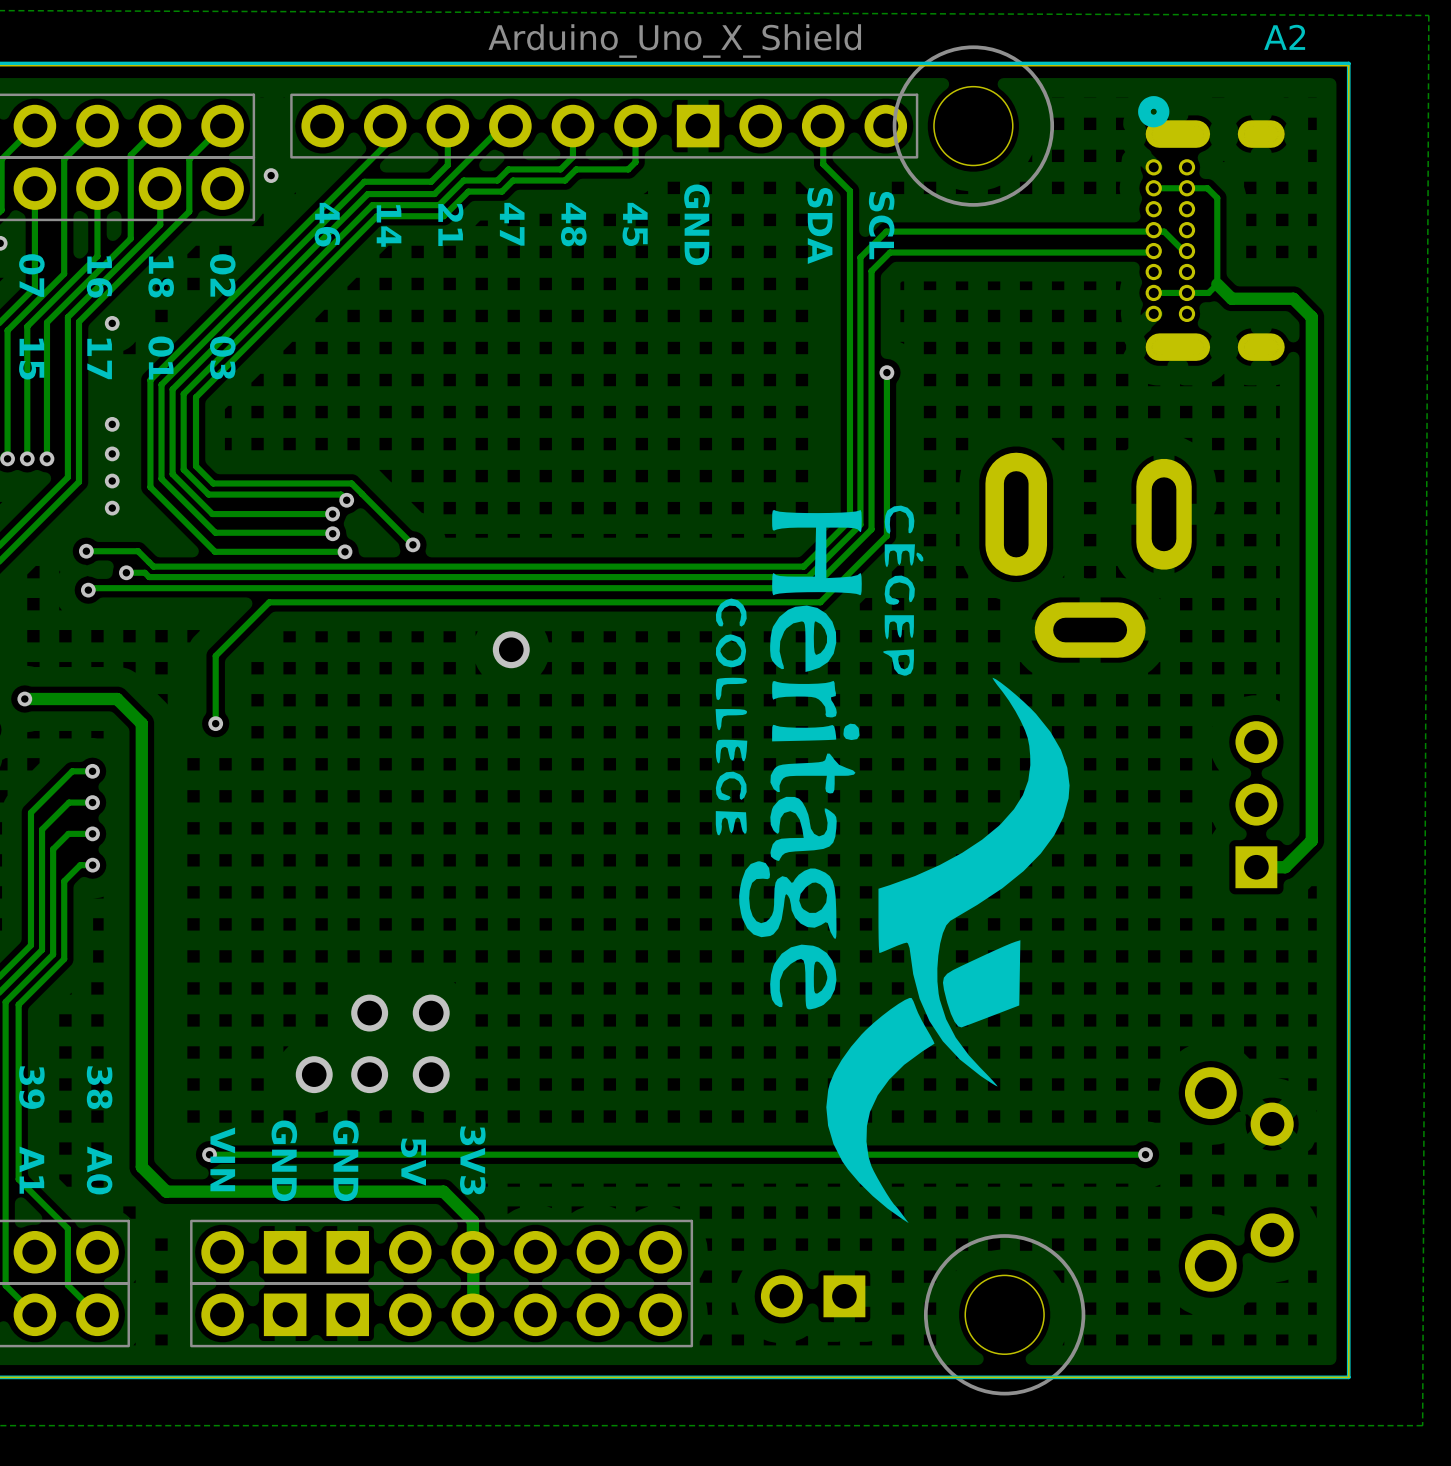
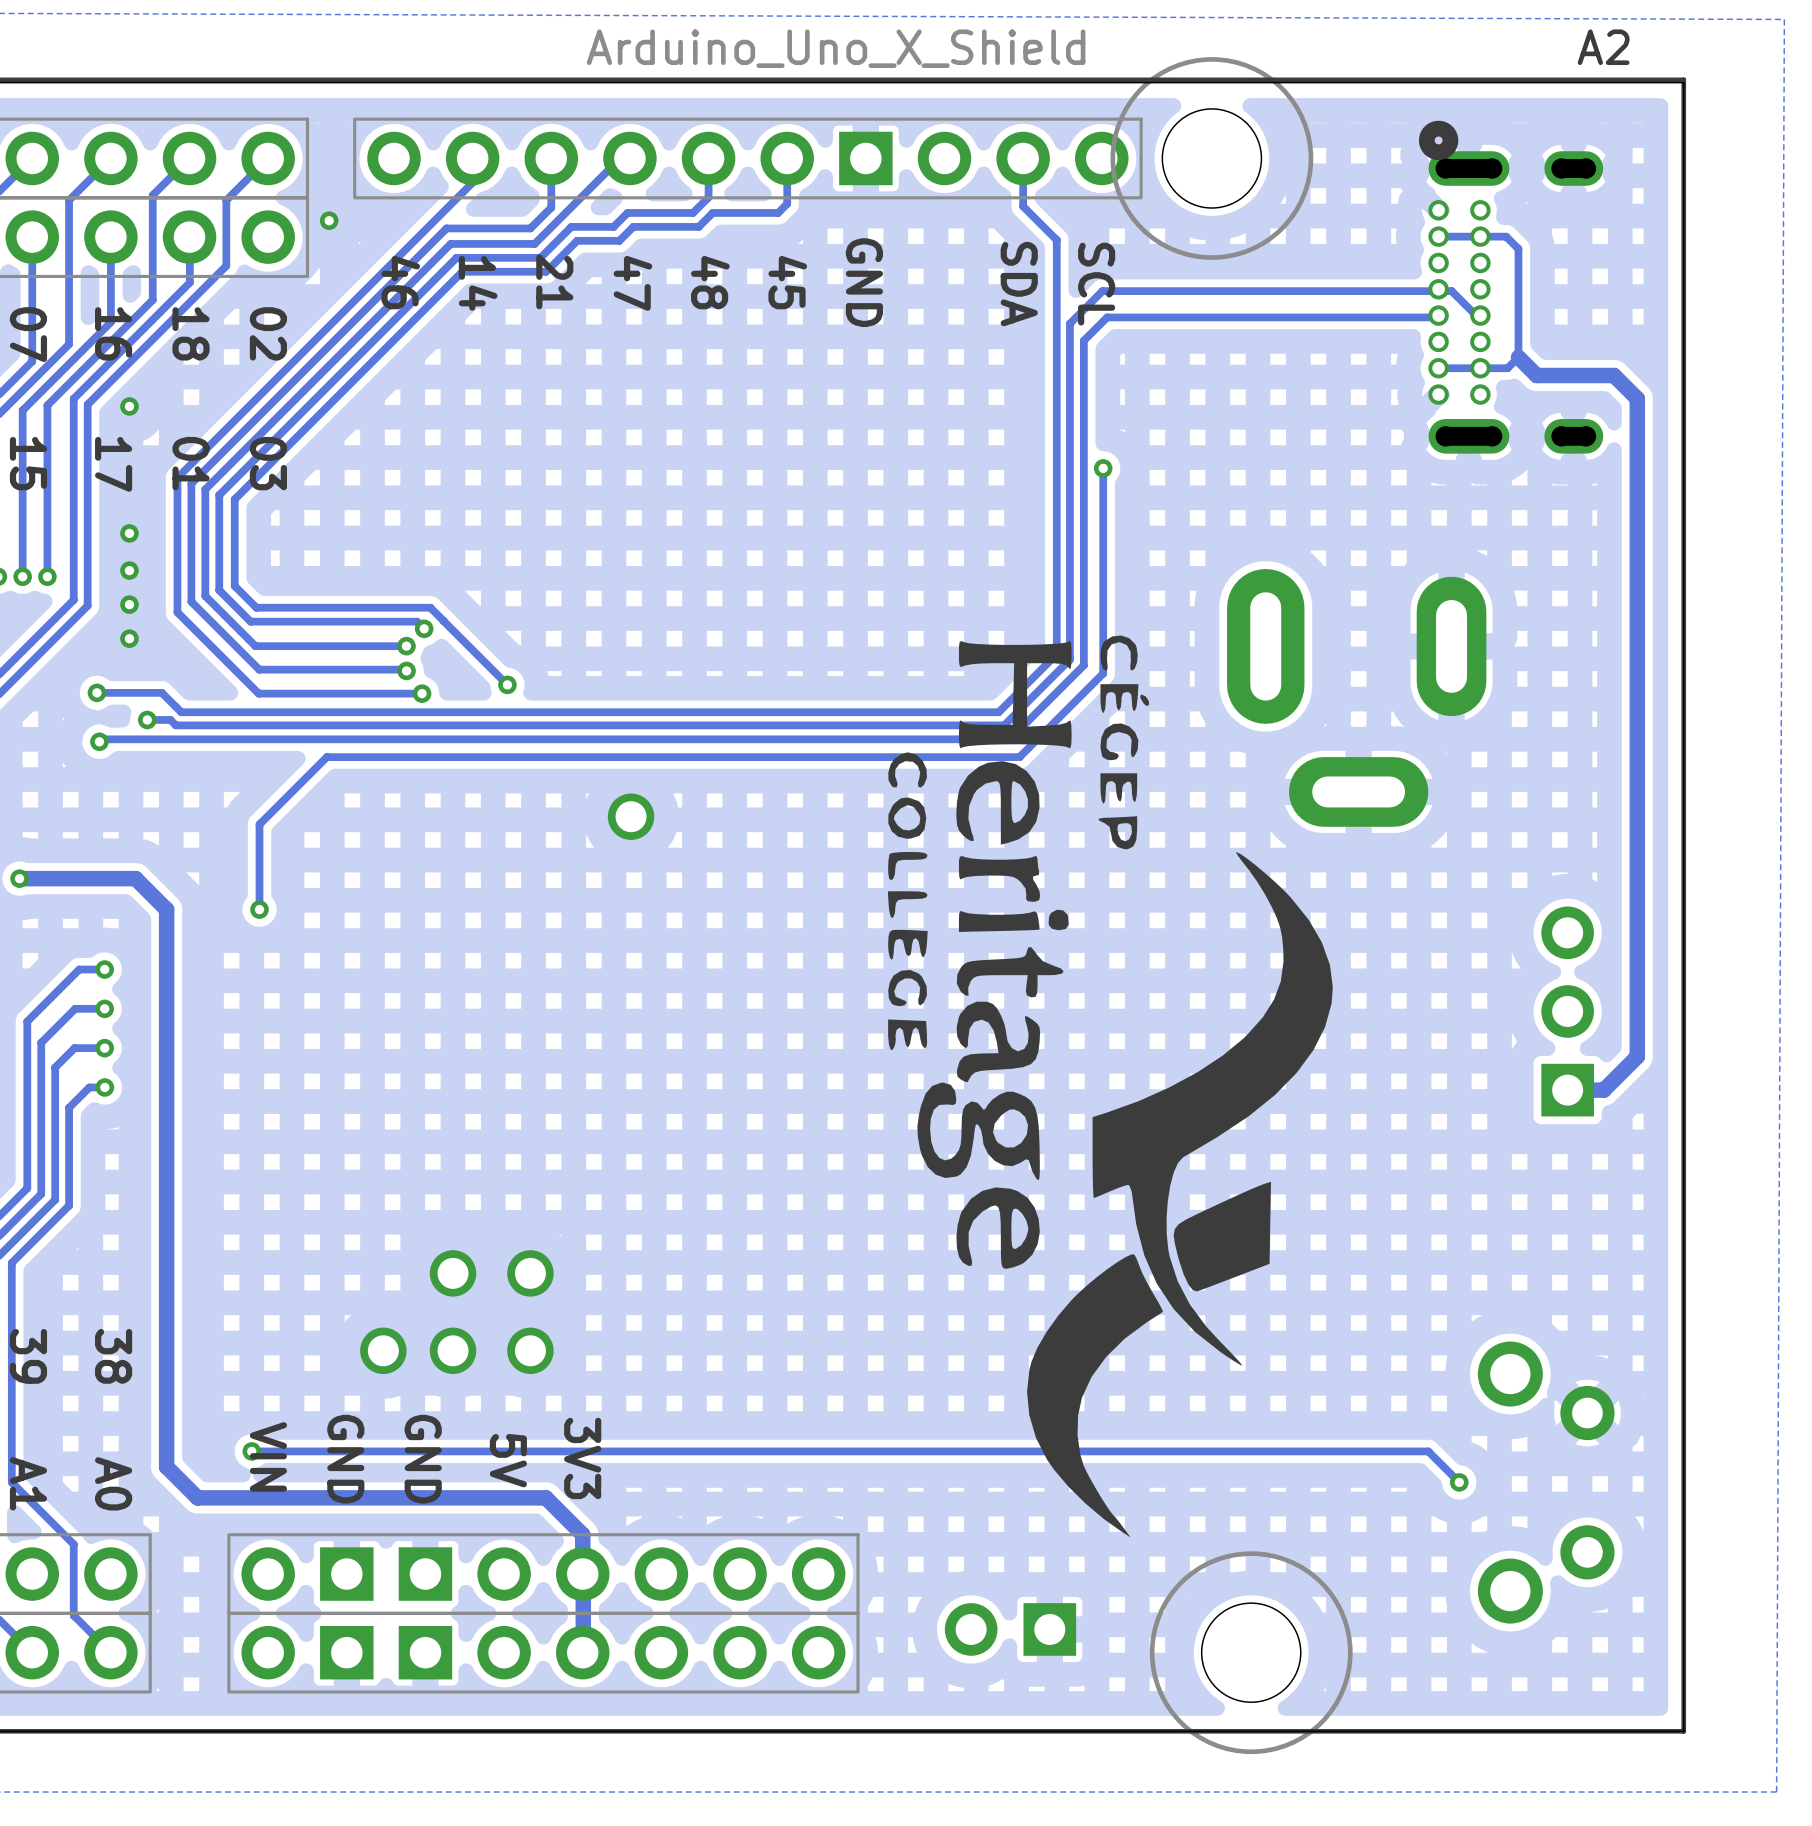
track: none -> (1428, 1451) (1459, 1482)
via position: (1145, 1154) -> (1459, 1482)

